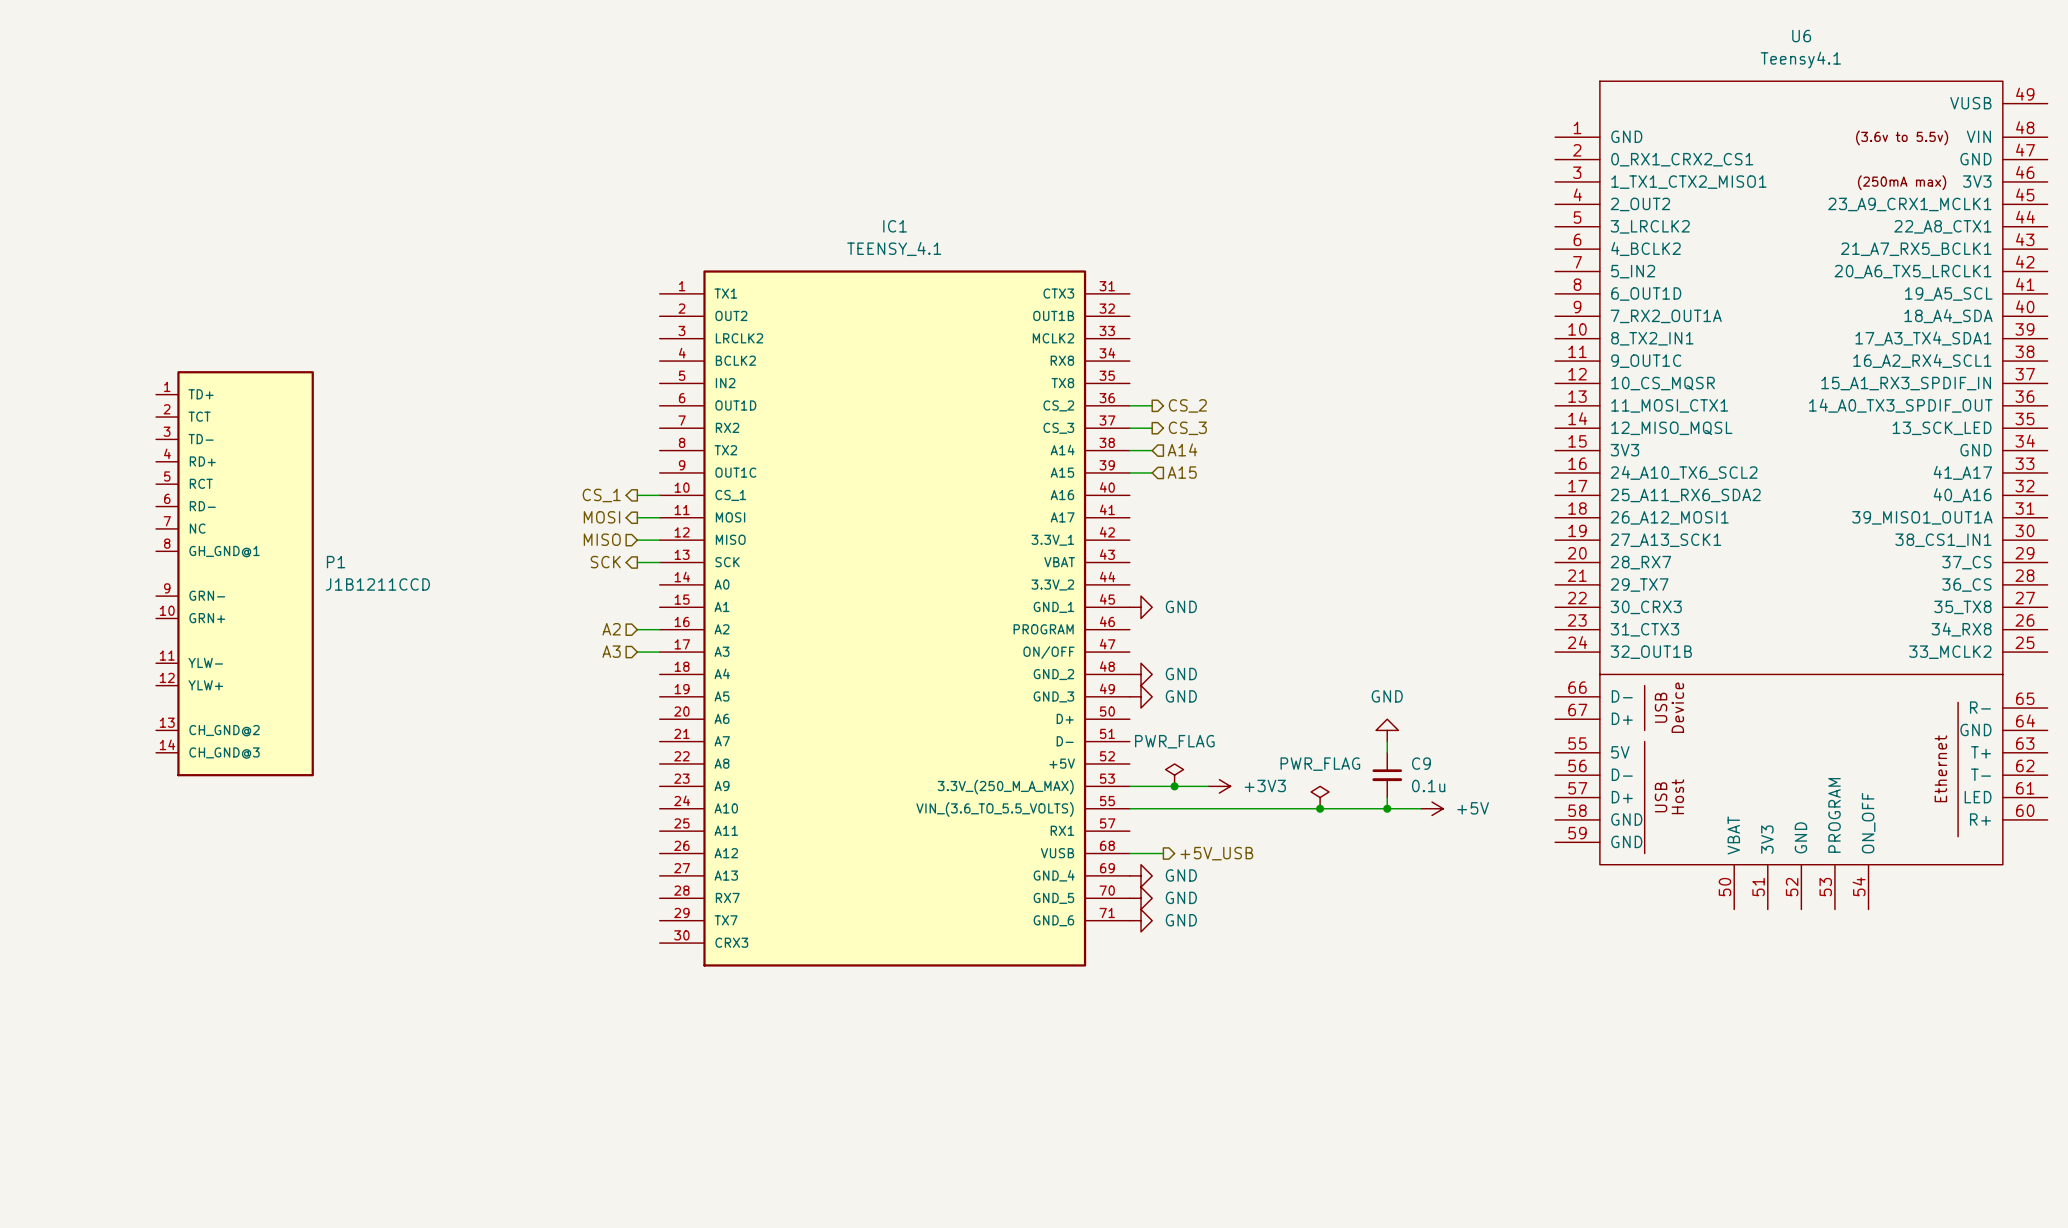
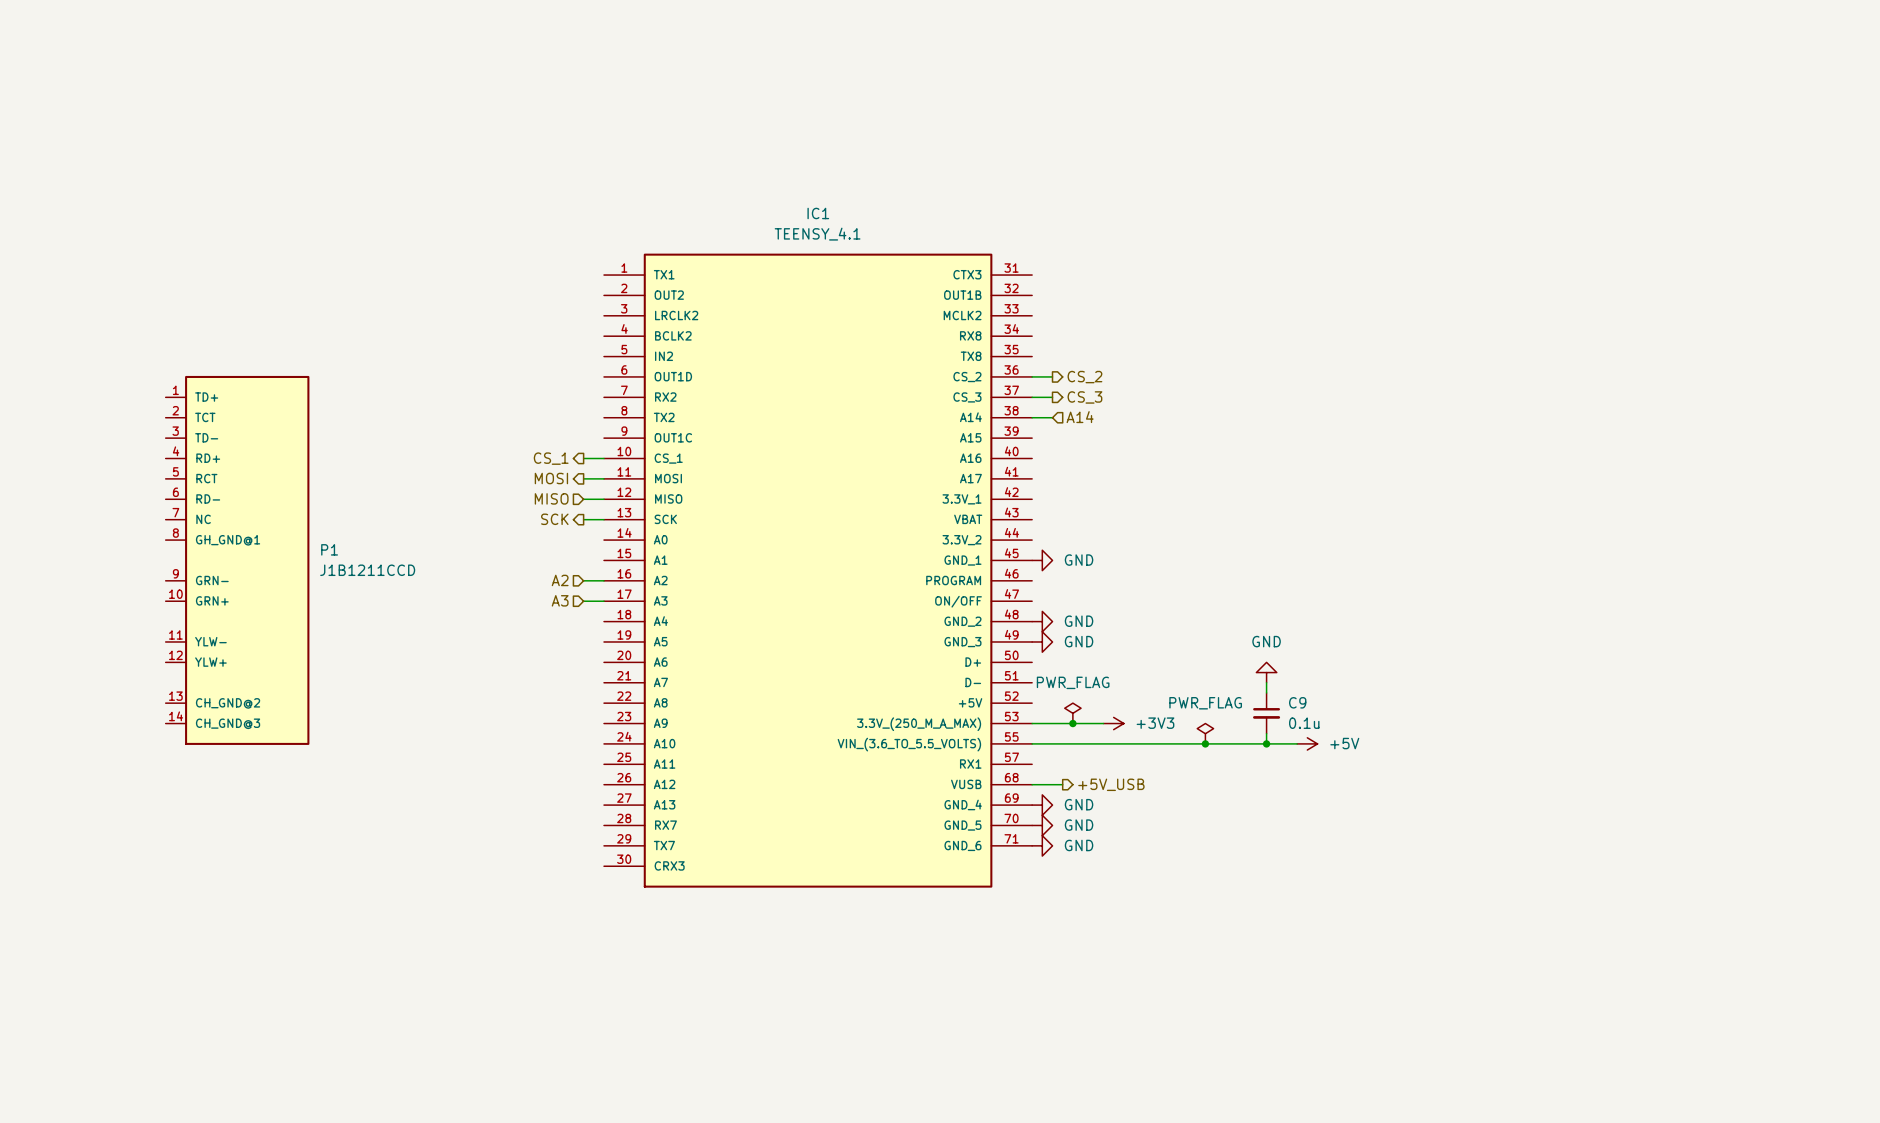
wire: (1129, 472) (1152, 472) -> none
hierarchical label: A15 (1182, 472) -> none
U6: Teensy4.1 (1801, 495) -> none
P1 position: (234, 573) -> (237, 560)

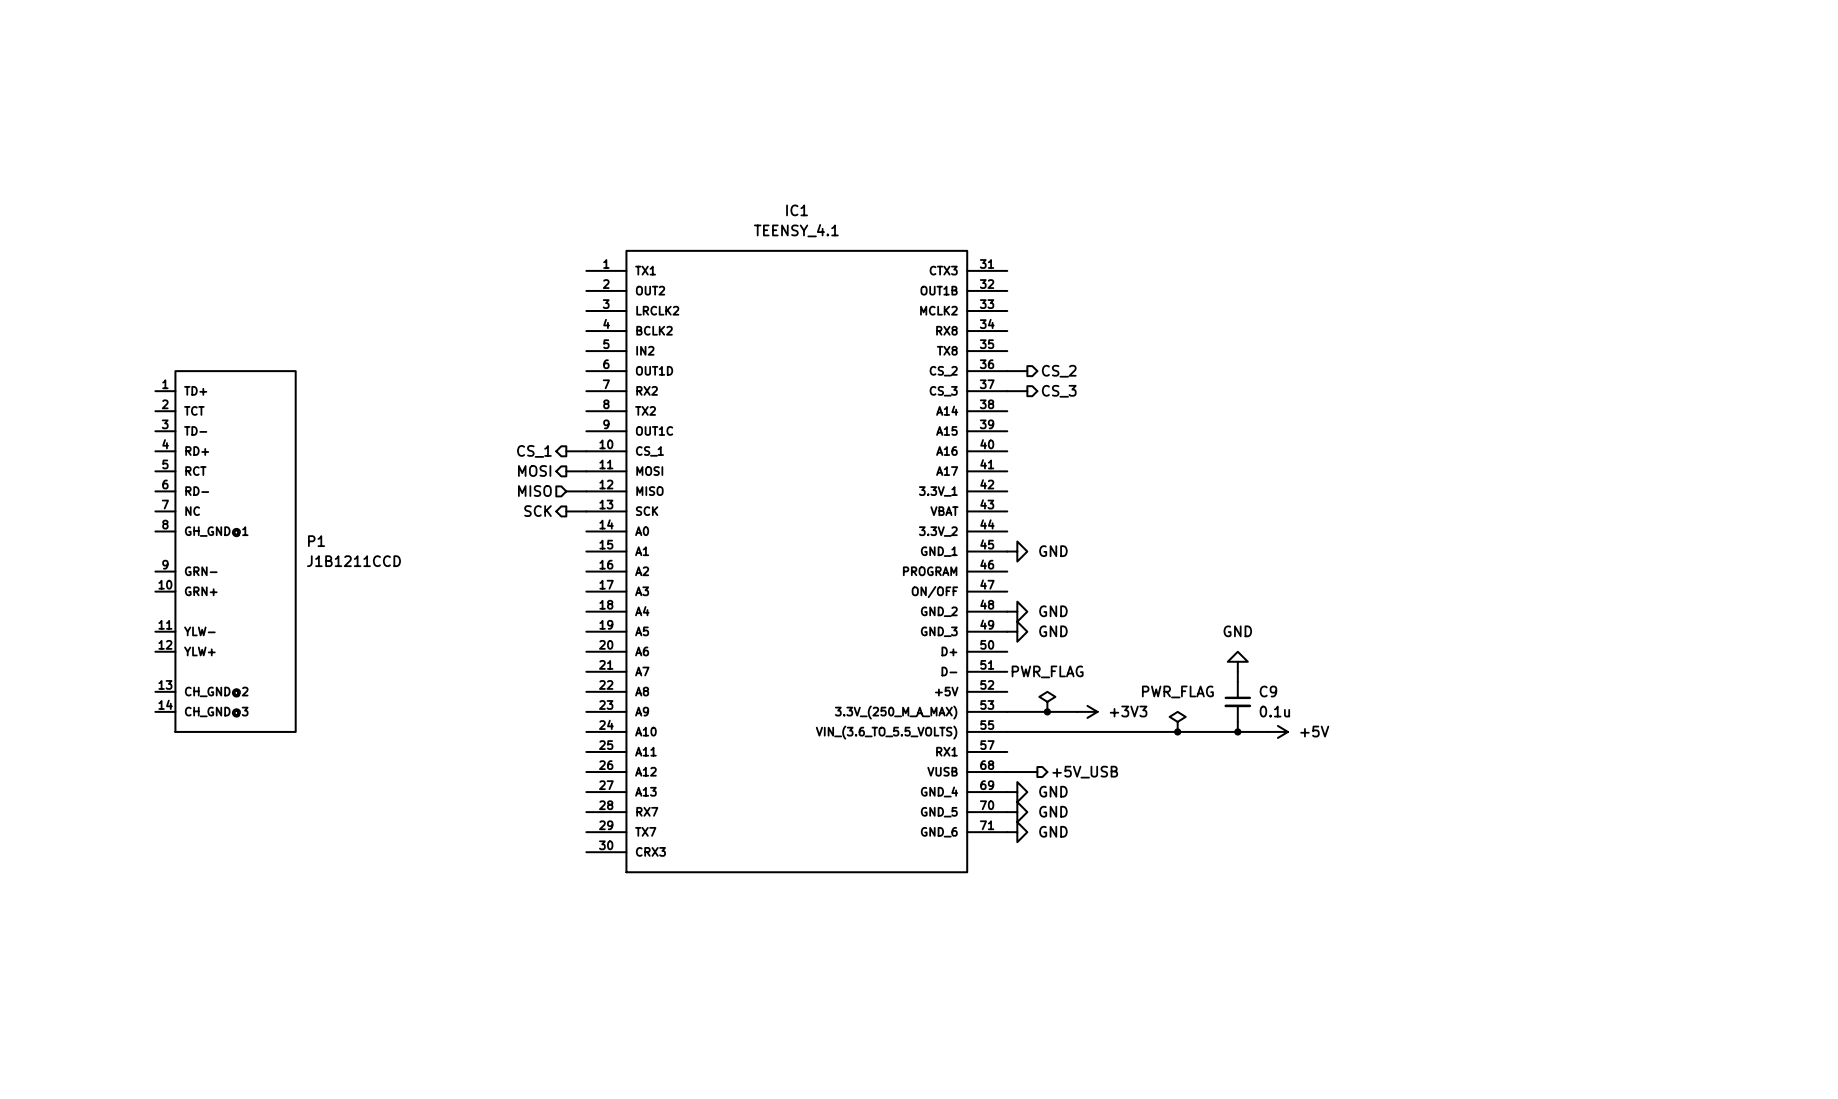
wire: (1032, 417) (1052, 417) -> none
hierarchical label: A14 (1080, 417) -> none
hierarchical label: A2 (560, 580) -> none
wire: (583, 580) (604, 580) -> none
hierarchical label: A3 (560, 600) -> none
wire: (583, 601) (604, 601) -> none

